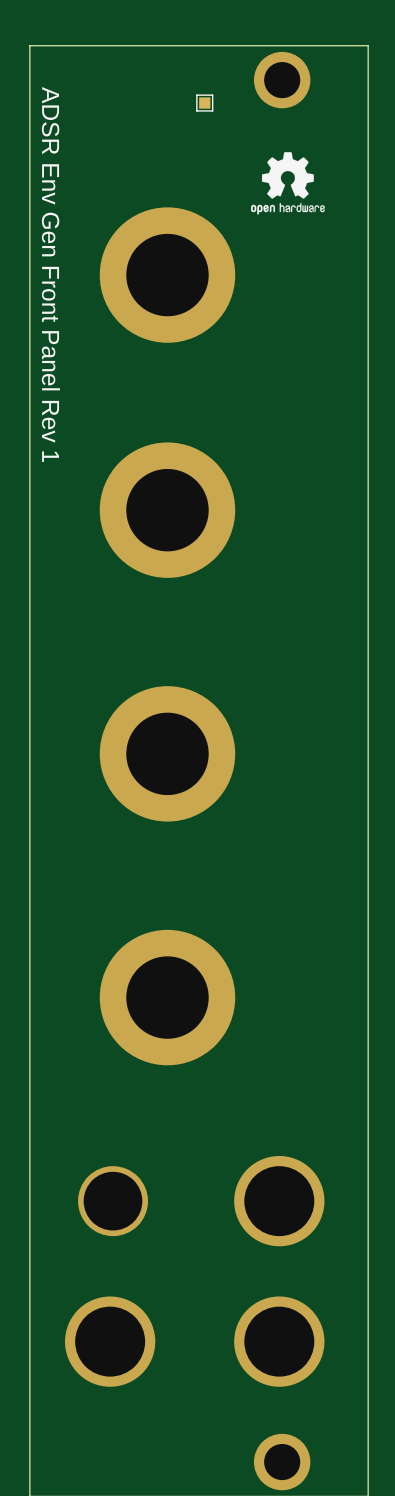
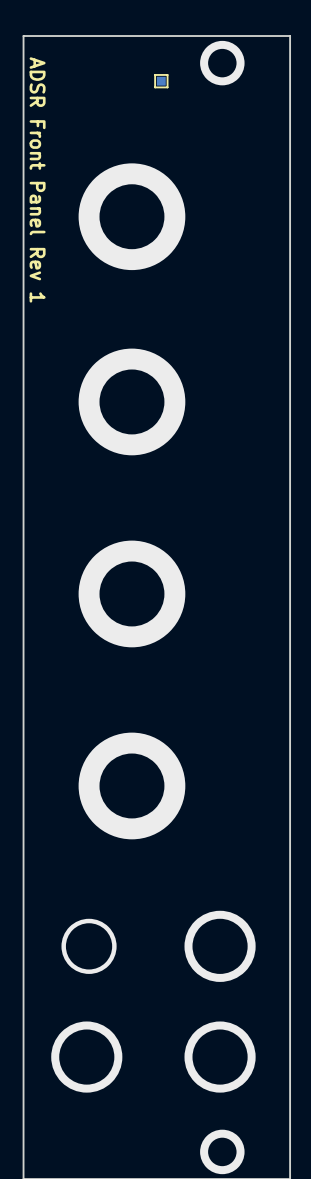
drawing: [250, 152, 325, 215] -> none
text: ADSR Env Gen Front Panel Rev 1 (50, 274) -> ADSR Front Panel Rev 1 (37, 179)

